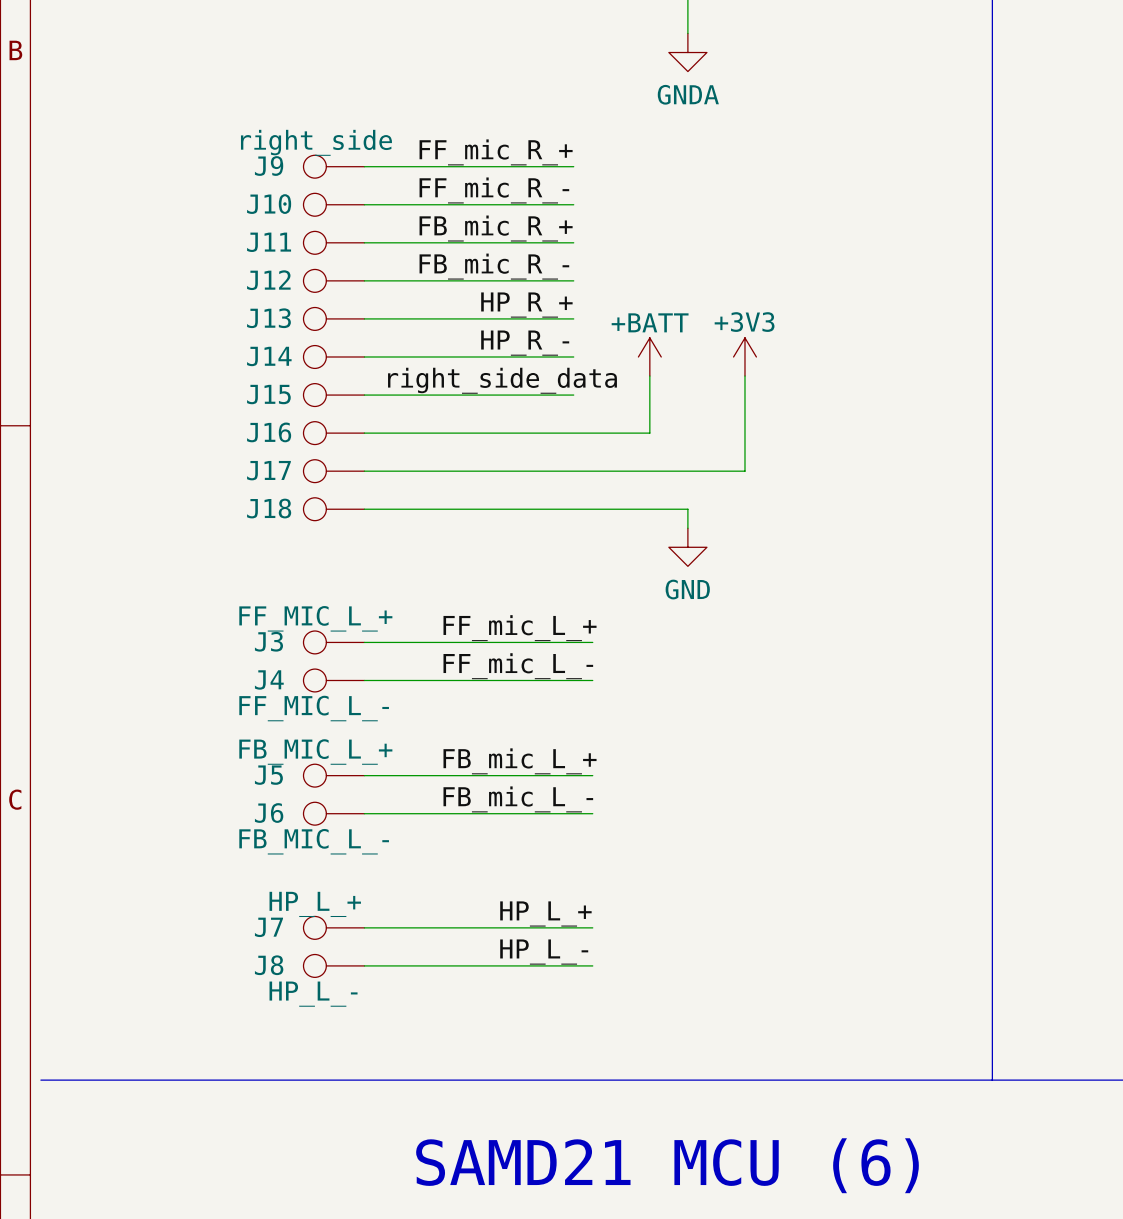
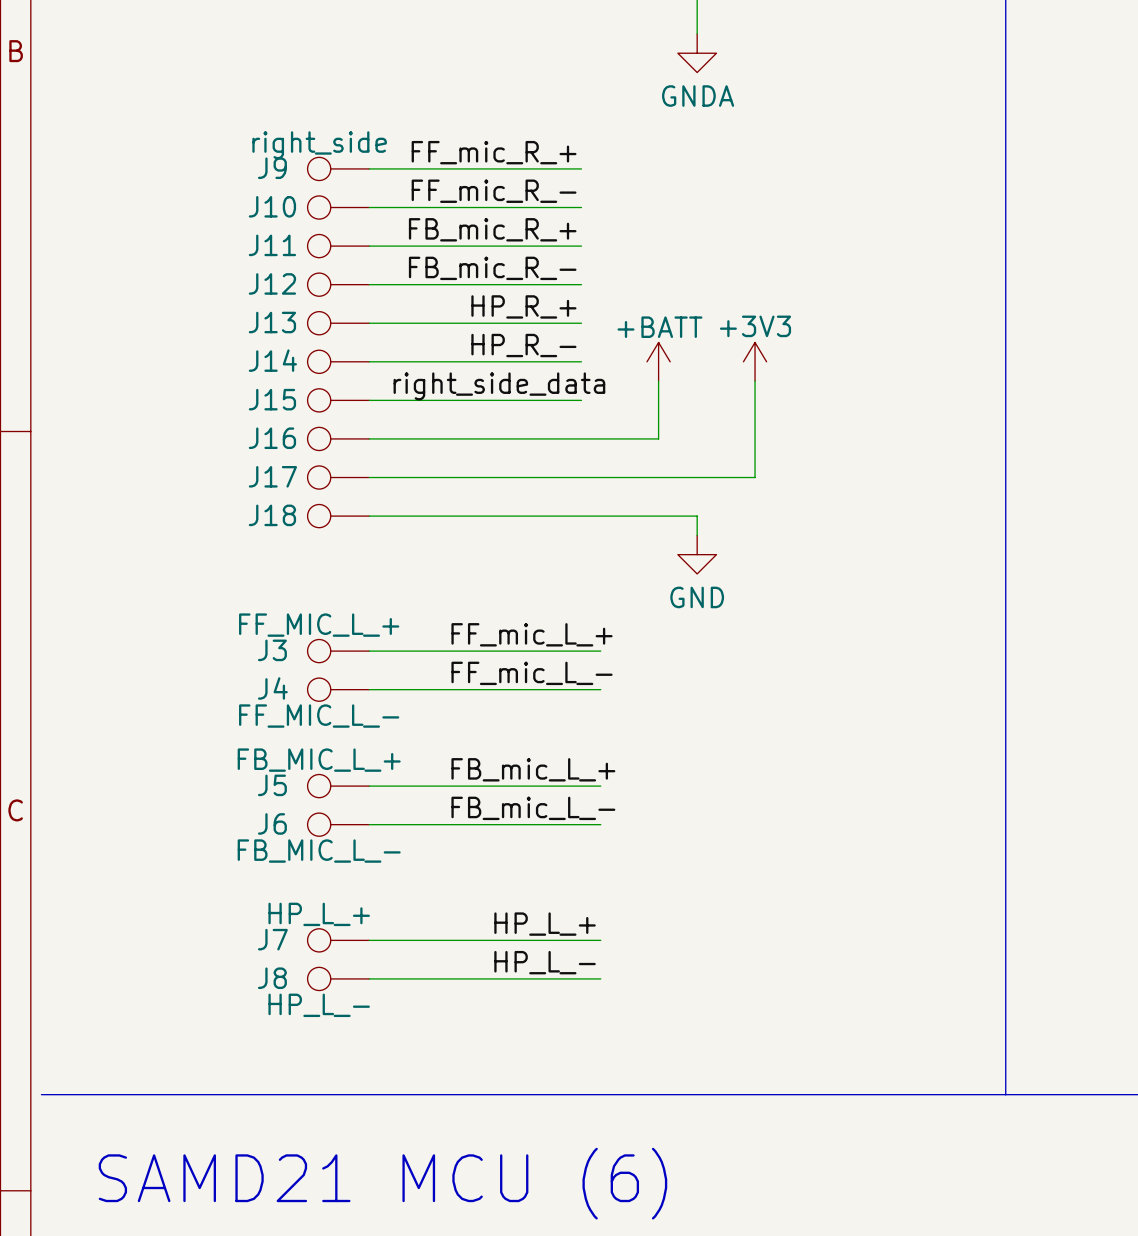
text position: SAMD21 MCU (6) (667, 1165) -> SAMD21 MCU (6) (382, 1183)

